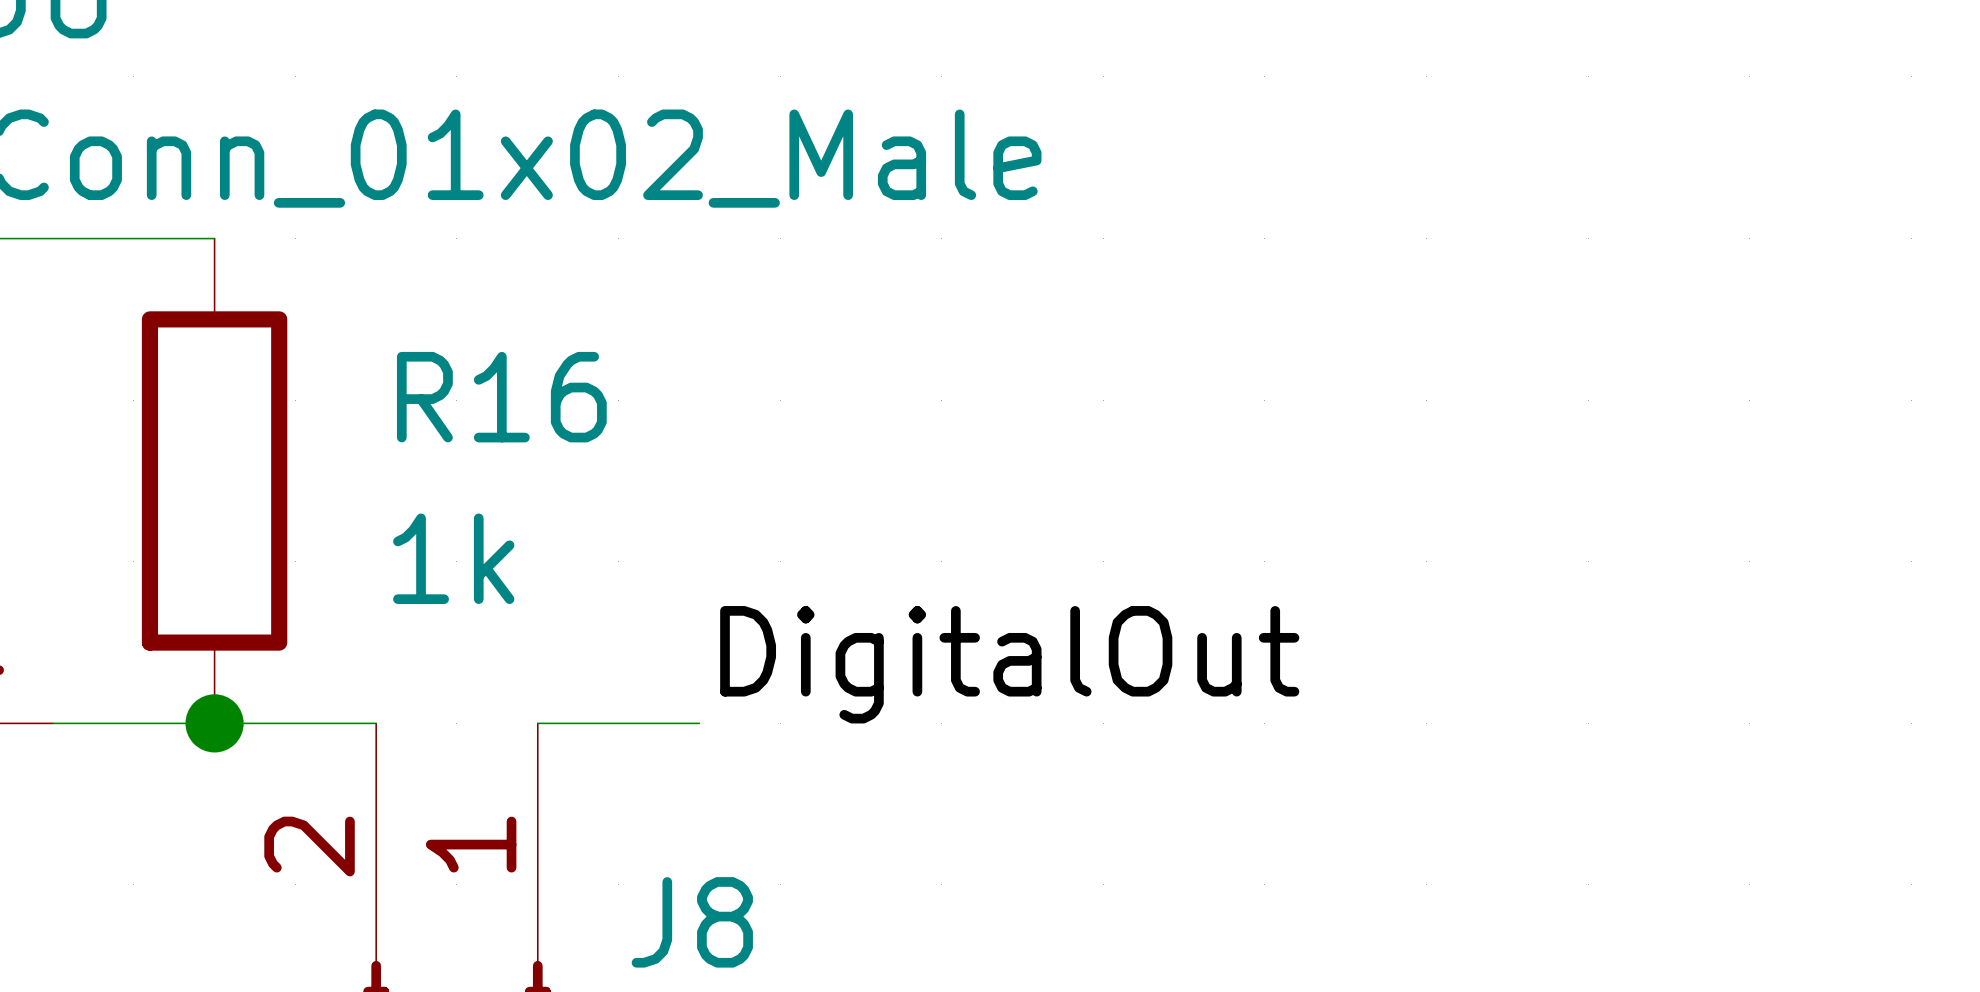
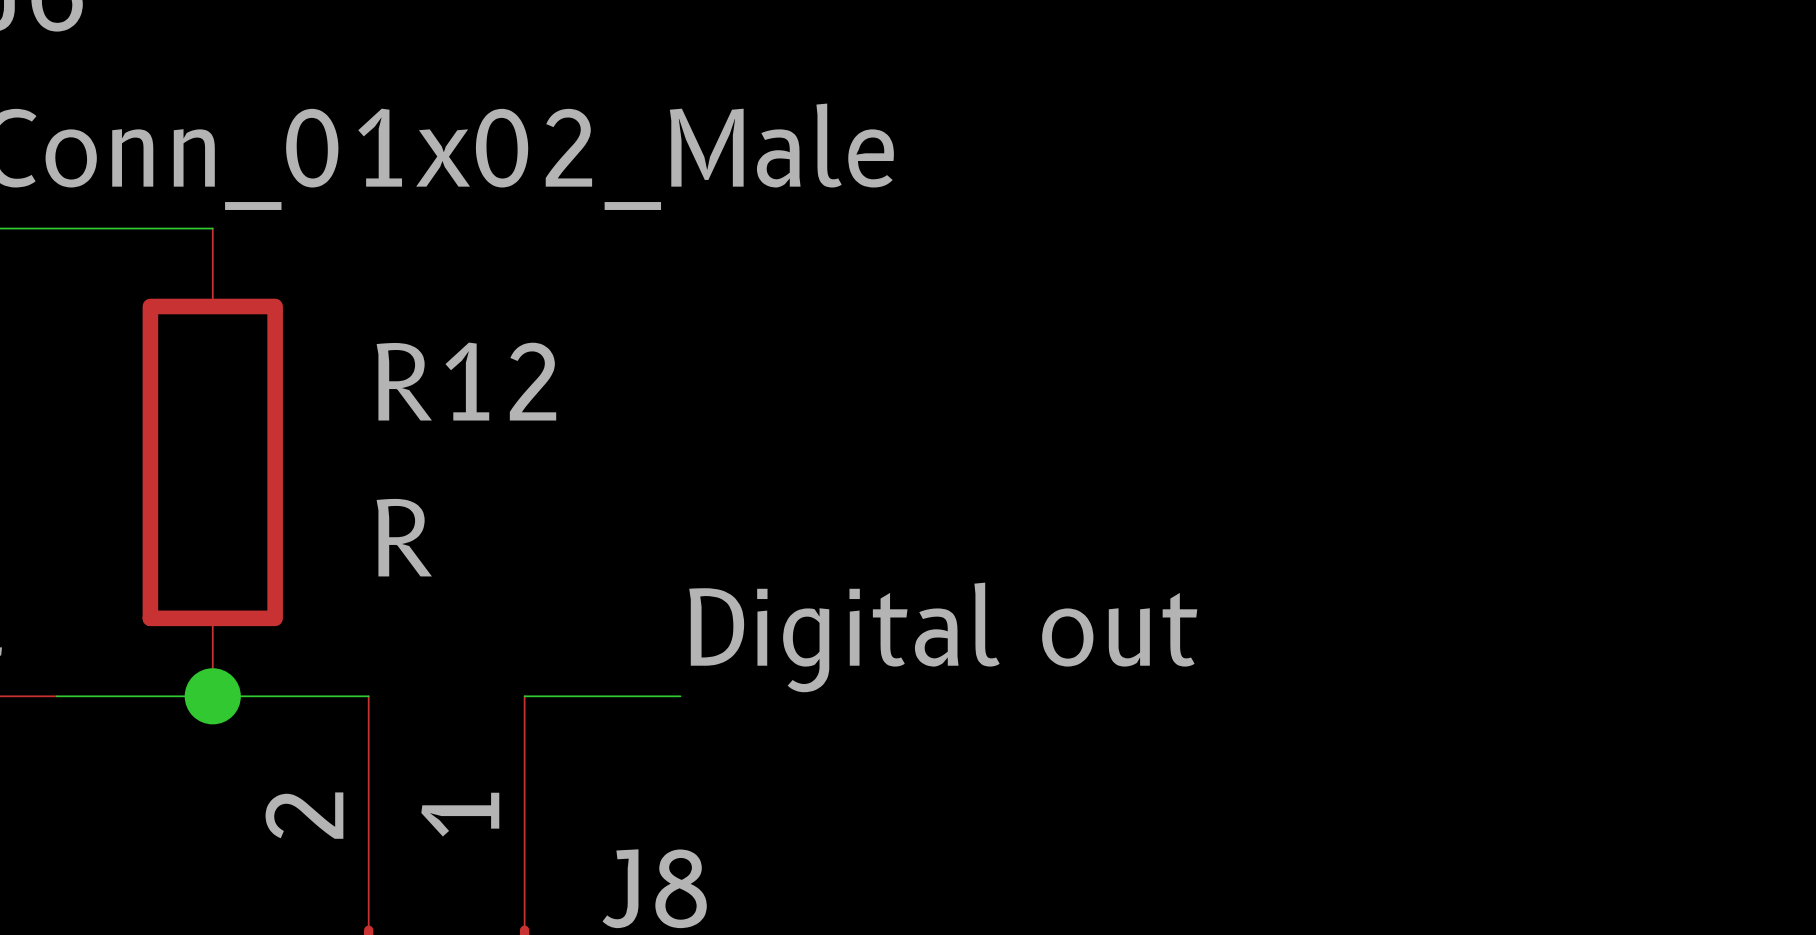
R16 name: R16 (501, 397) -> R12 (466, 381)
R16 value: 1k (453, 558) -> R (404, 537)
label: DigitalOut (1009, 664) -> Digital out (943, 637)

